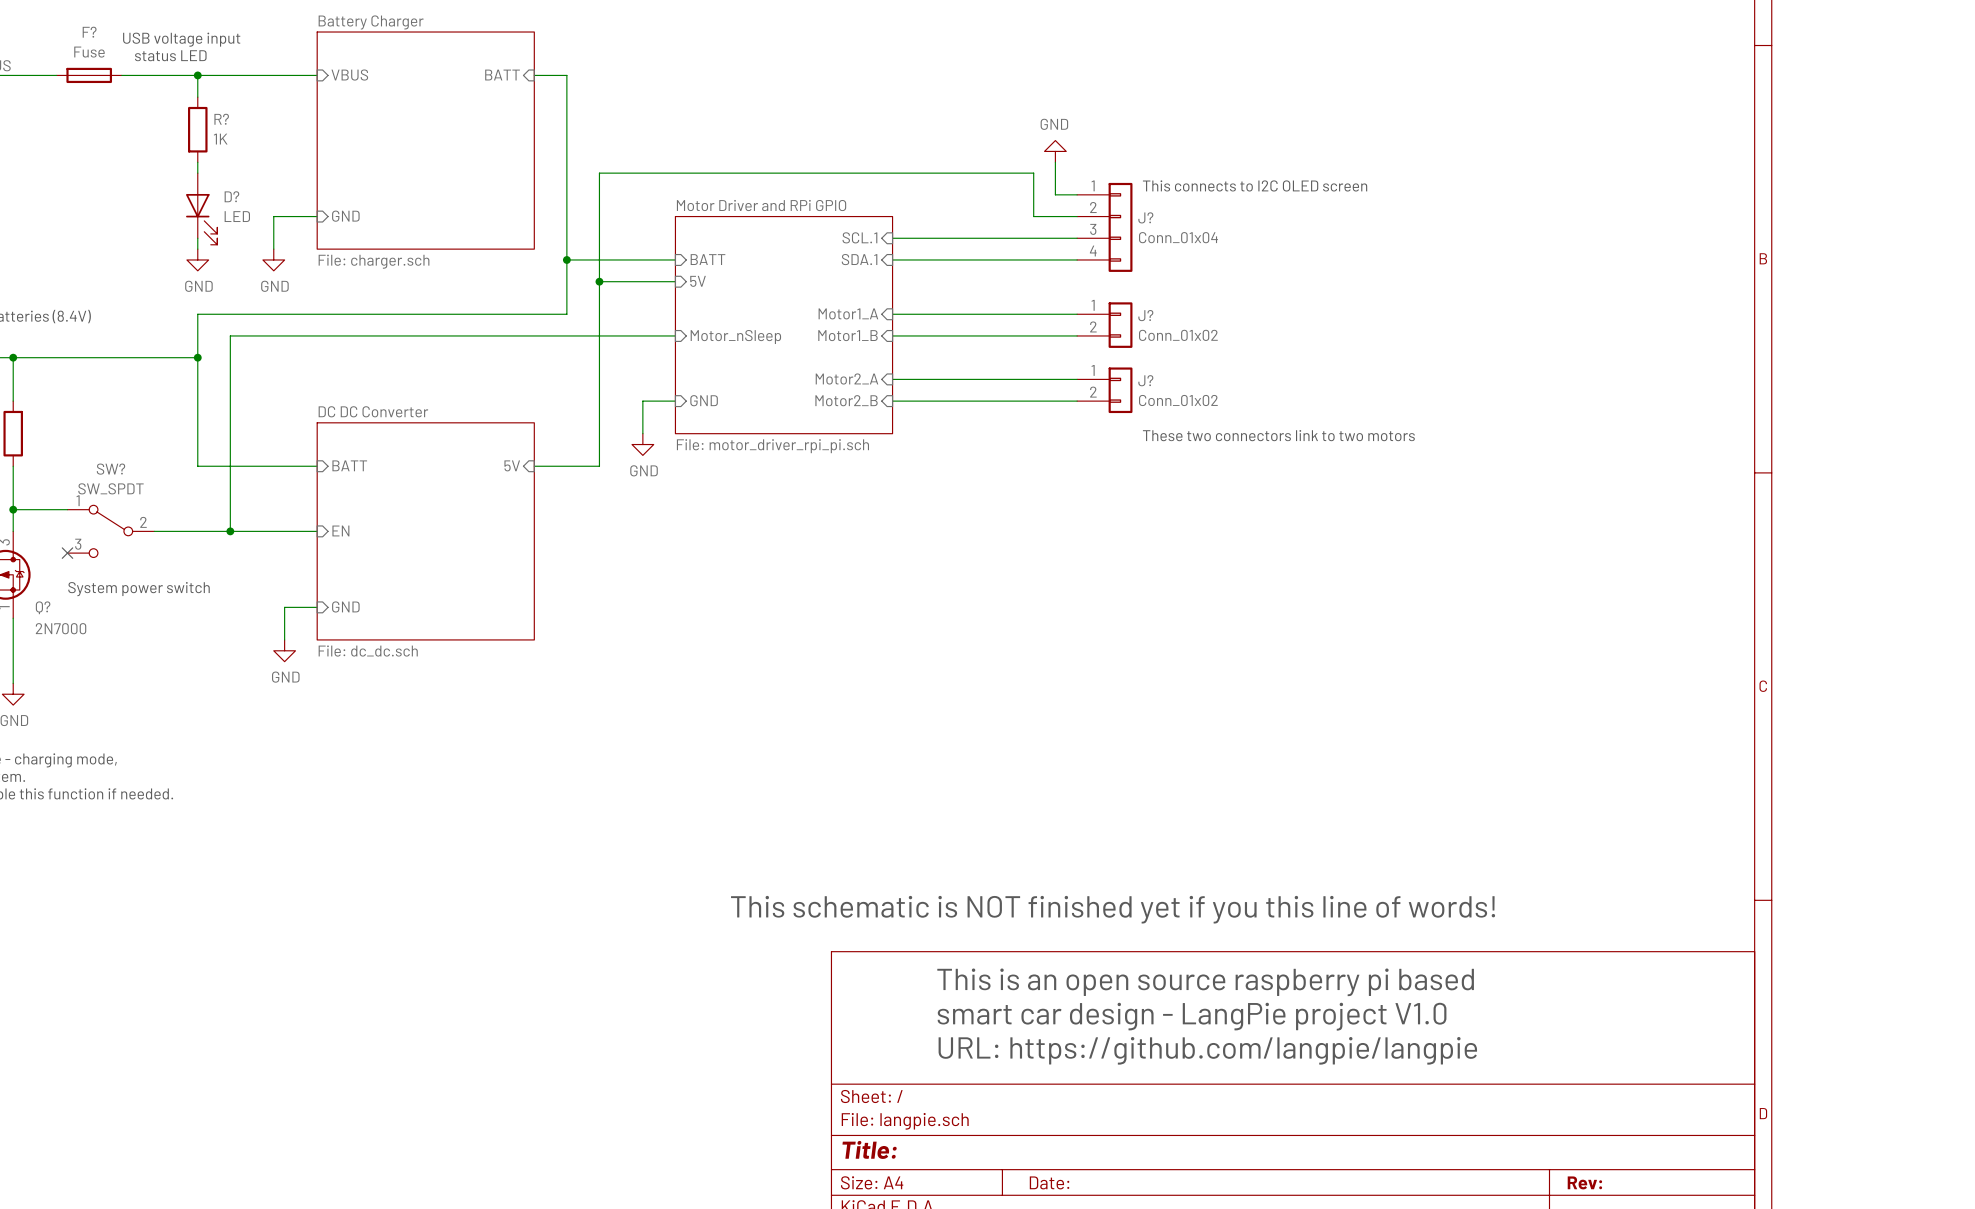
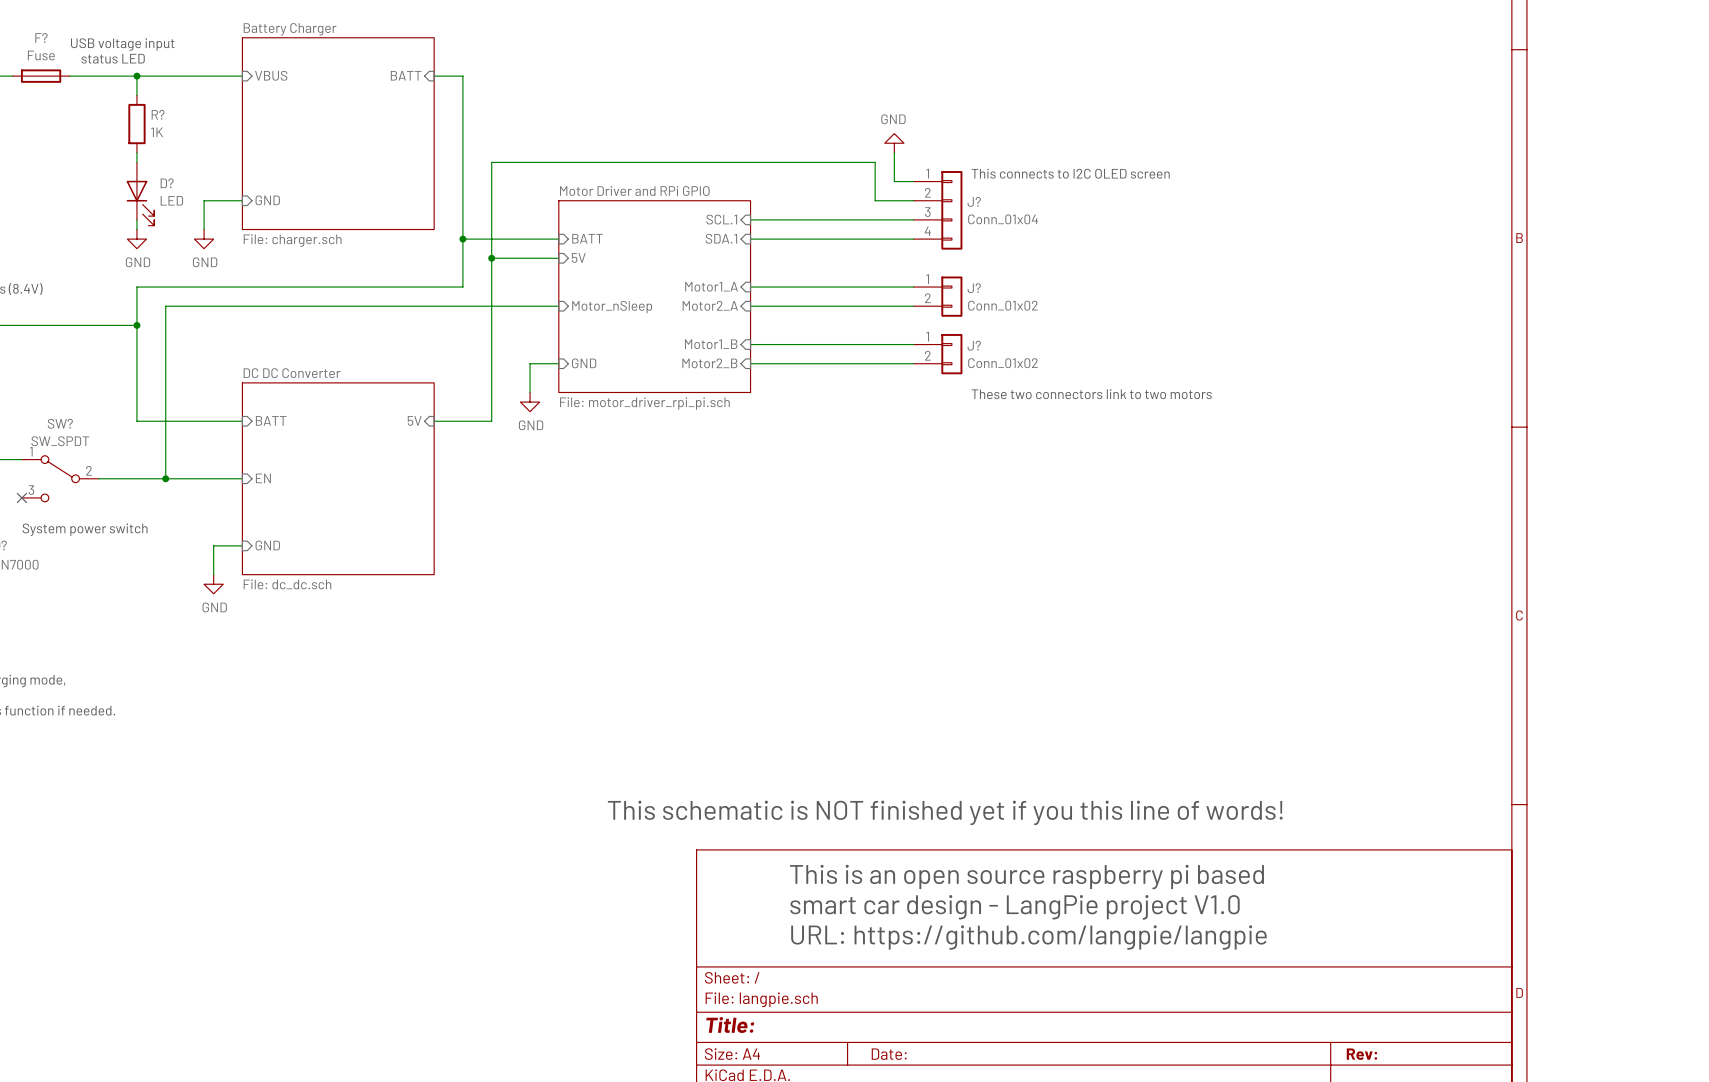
sheet pin: Motor1_B (847, 335) -> Motor2_A (710, 305)
sheet pin: Motor2_A (846, 378) -> Motor1_B (711, 344)

